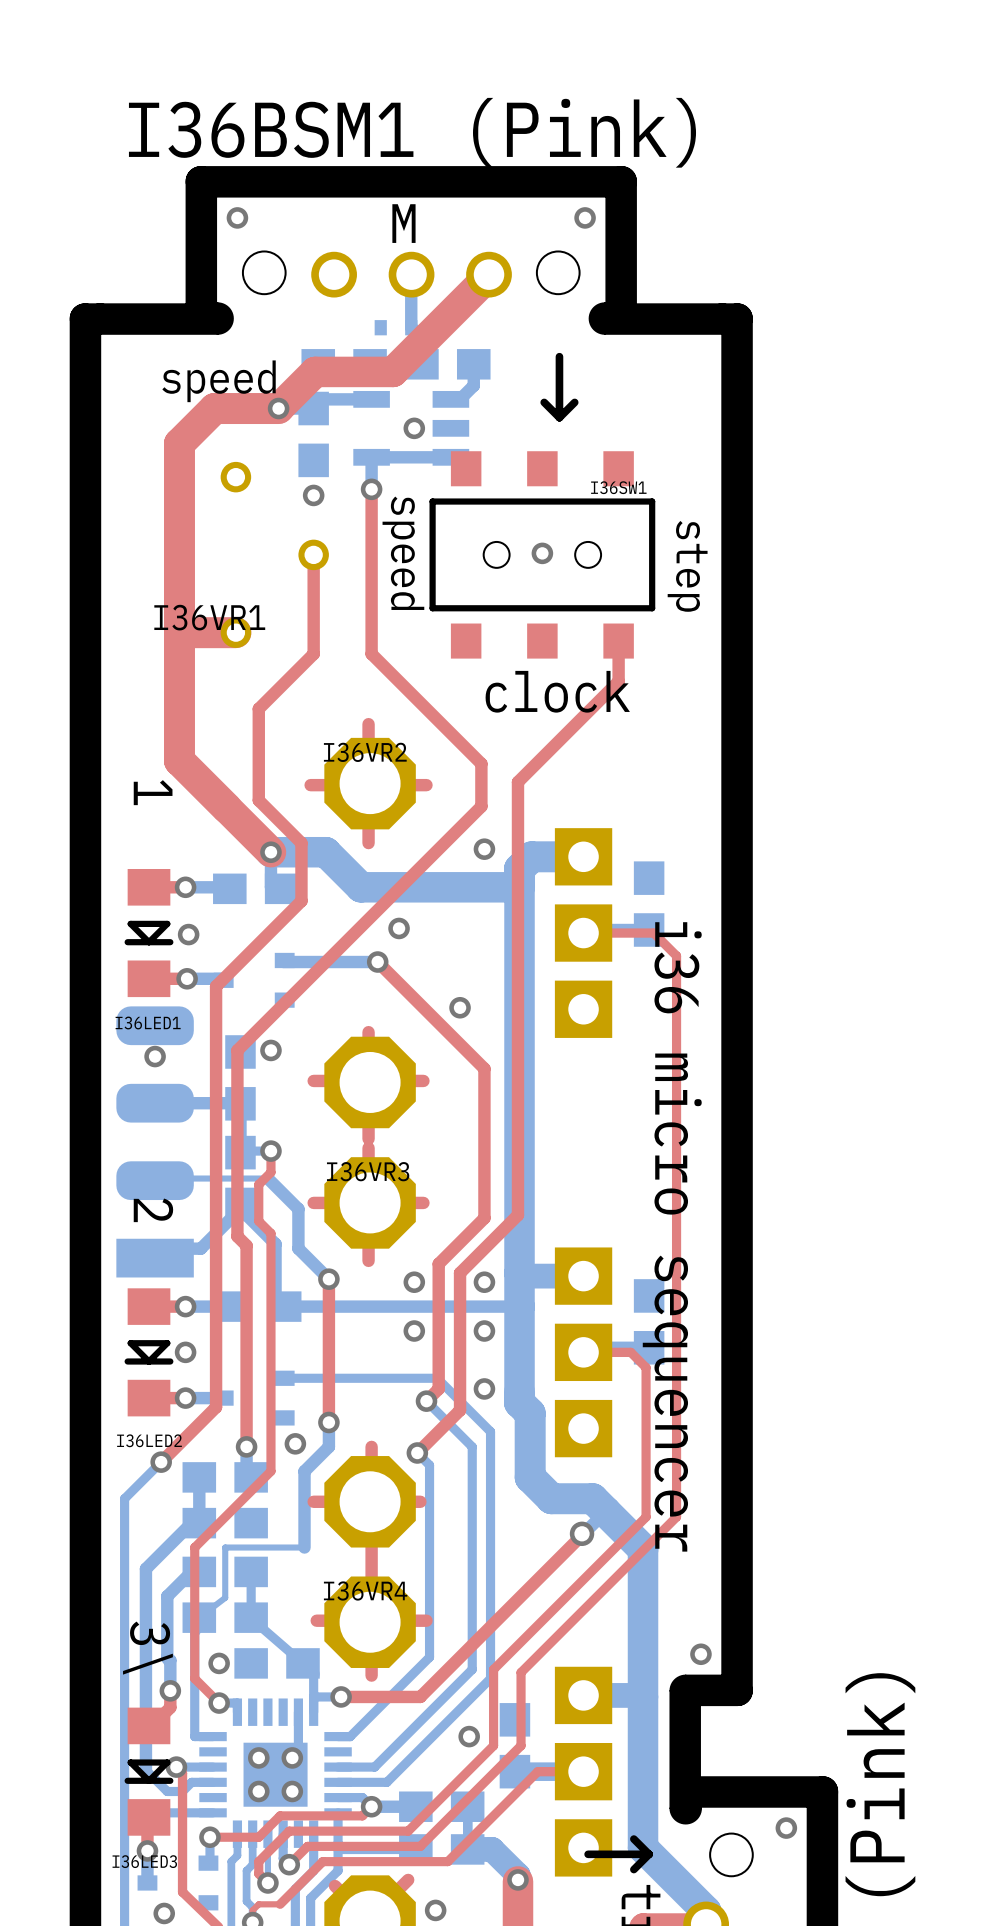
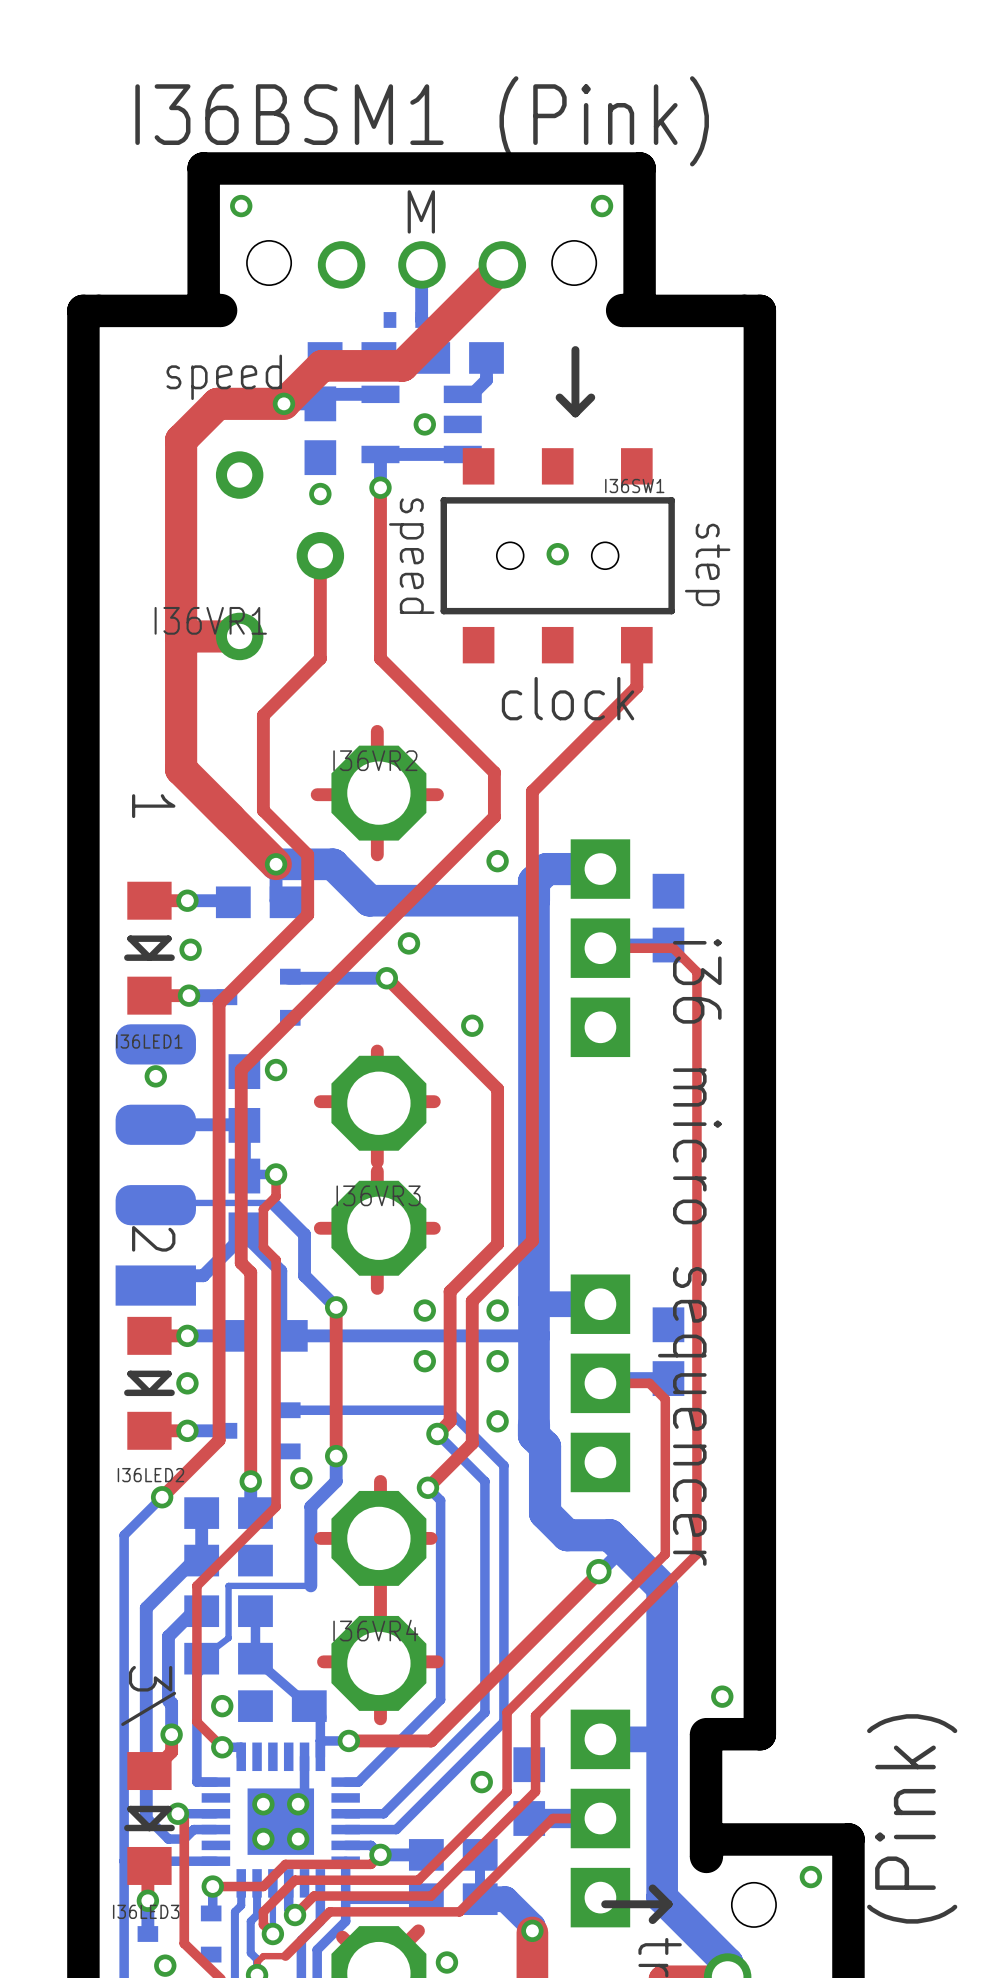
I36VR1 footprint: [220, 461, 329, 648] -> [215, 451, 345, 661]

